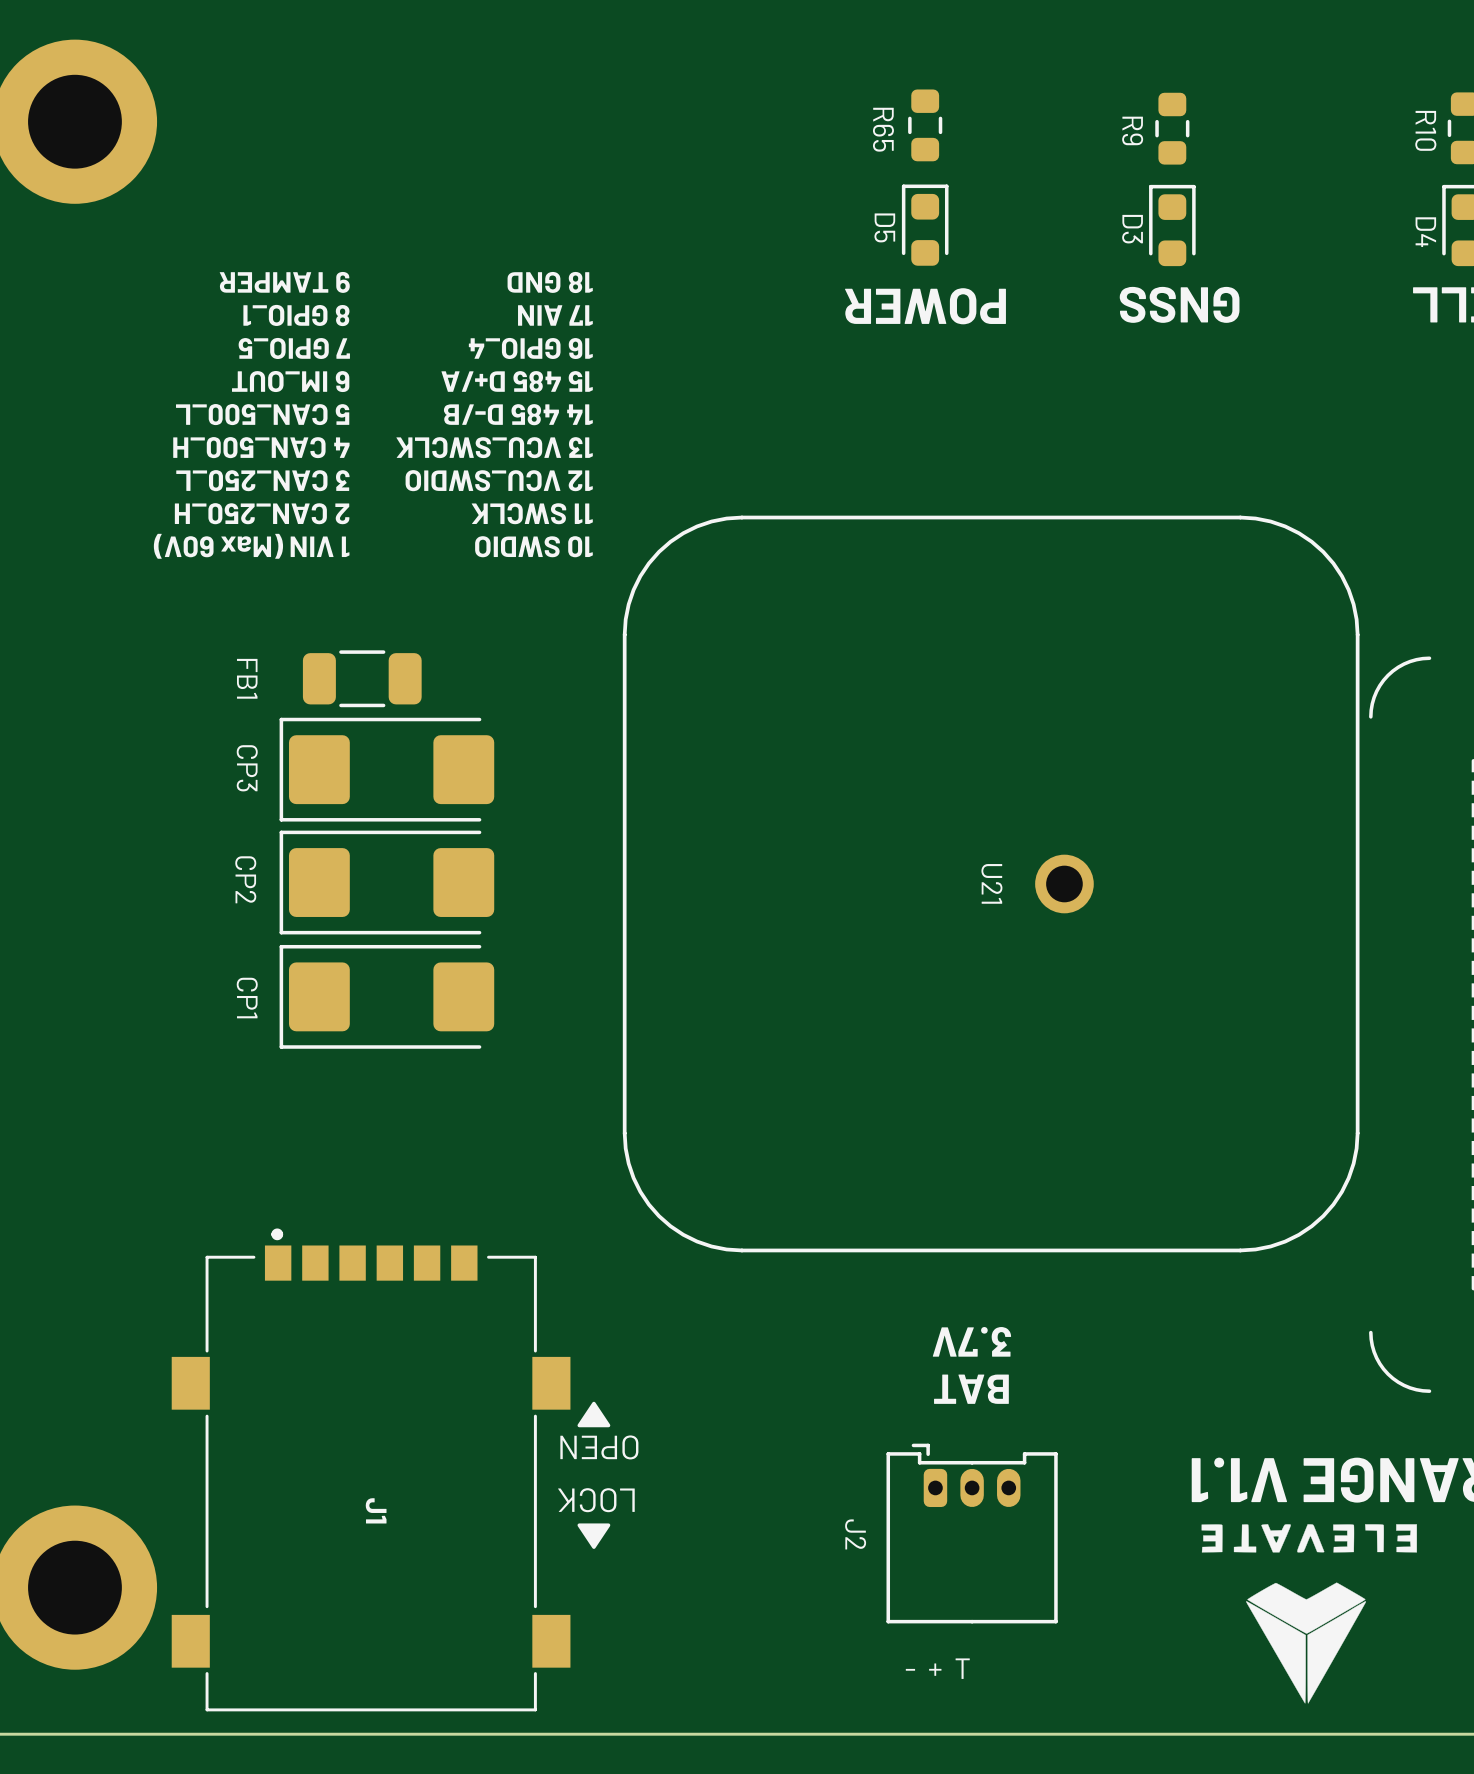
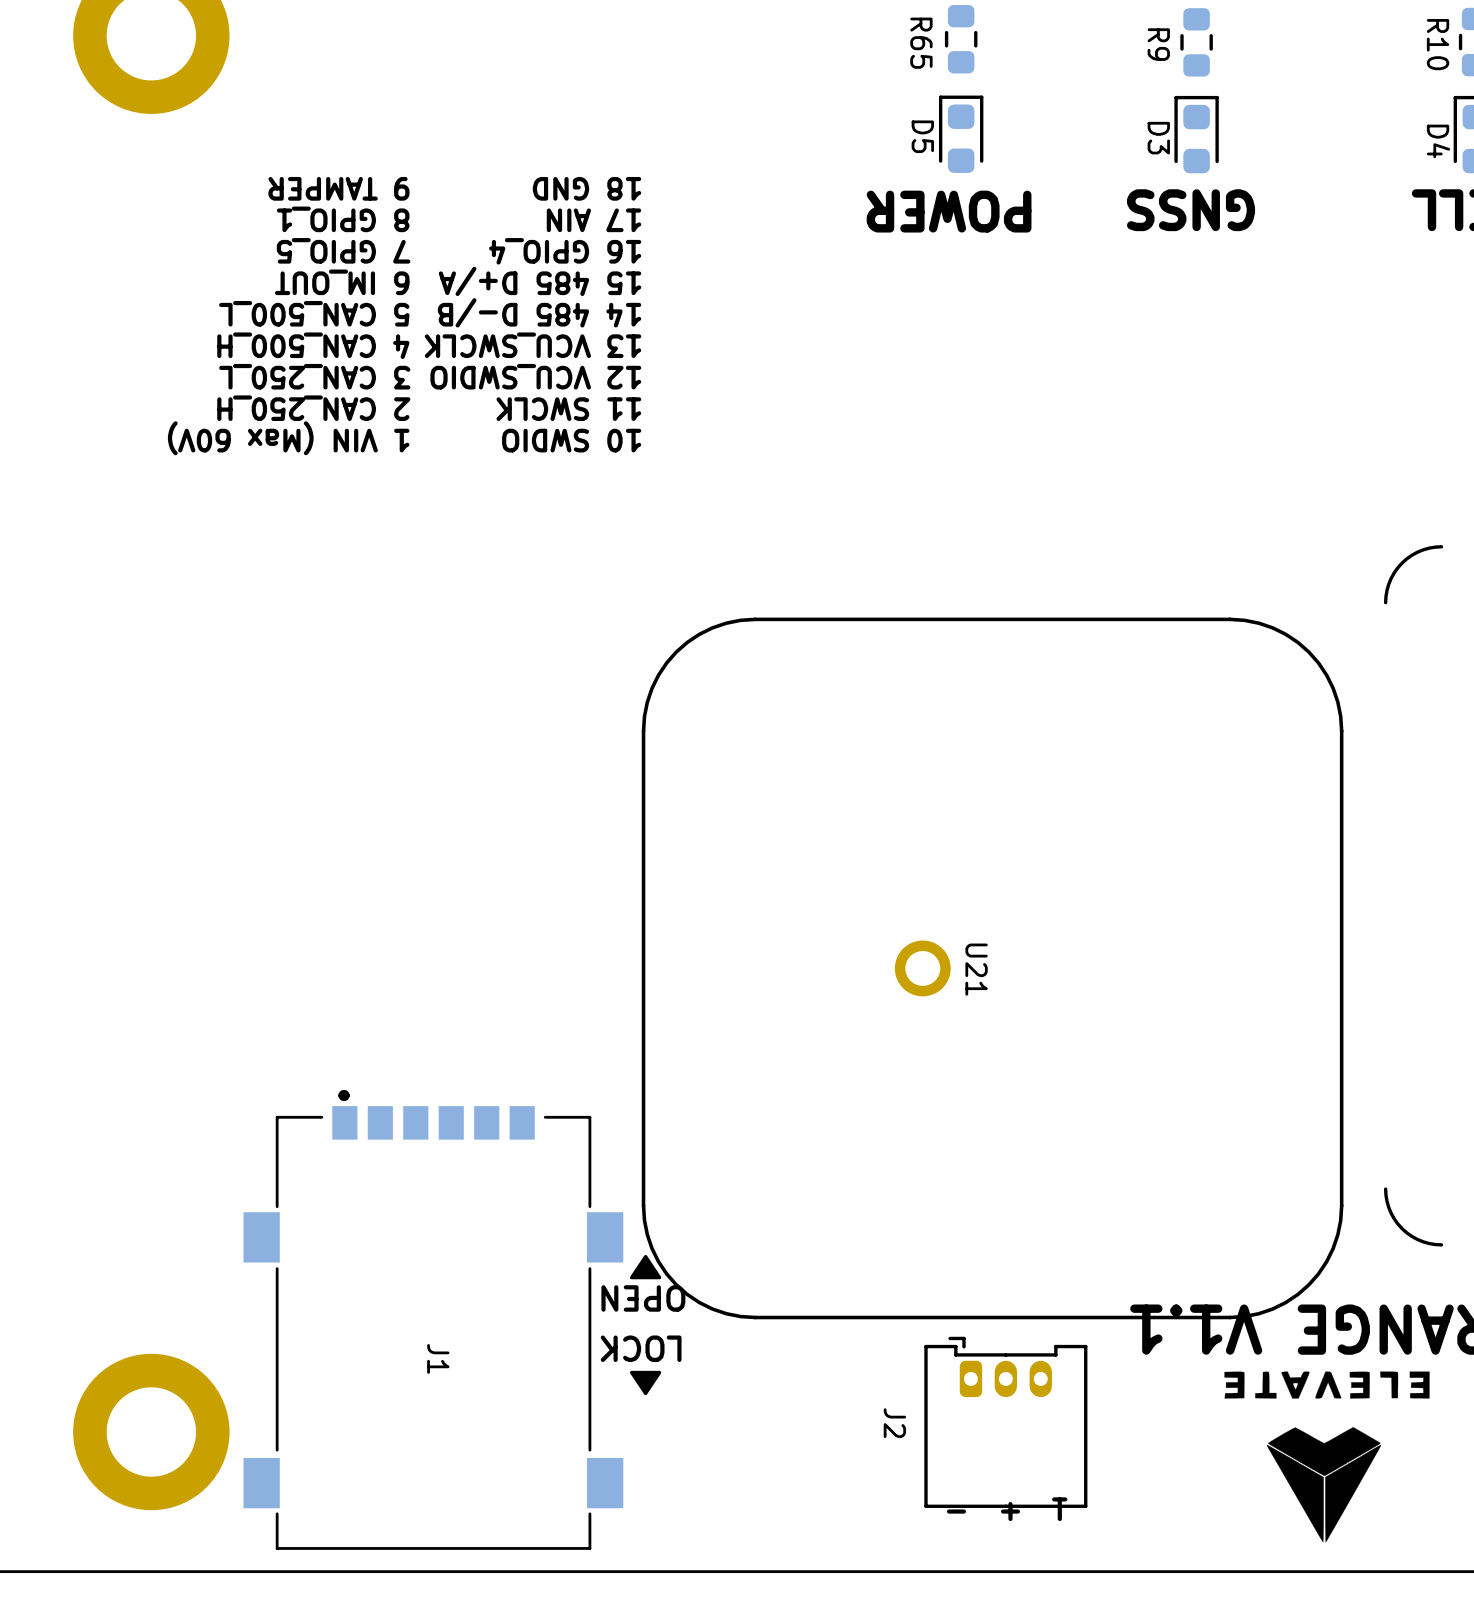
FB1: (362, 678) -> none
CP3: (386, 769) -> none
CP2: (386, 882) -> none
U21 rotation: 0° (991, 883) -> 180° (992, 968)
CP1: (386, 996) -> none
text: 3.7V (971, 1341) -> none
text: BAT (971, 1389) -> none
J2 position: (972, 1533) -> (1005, 1422)

